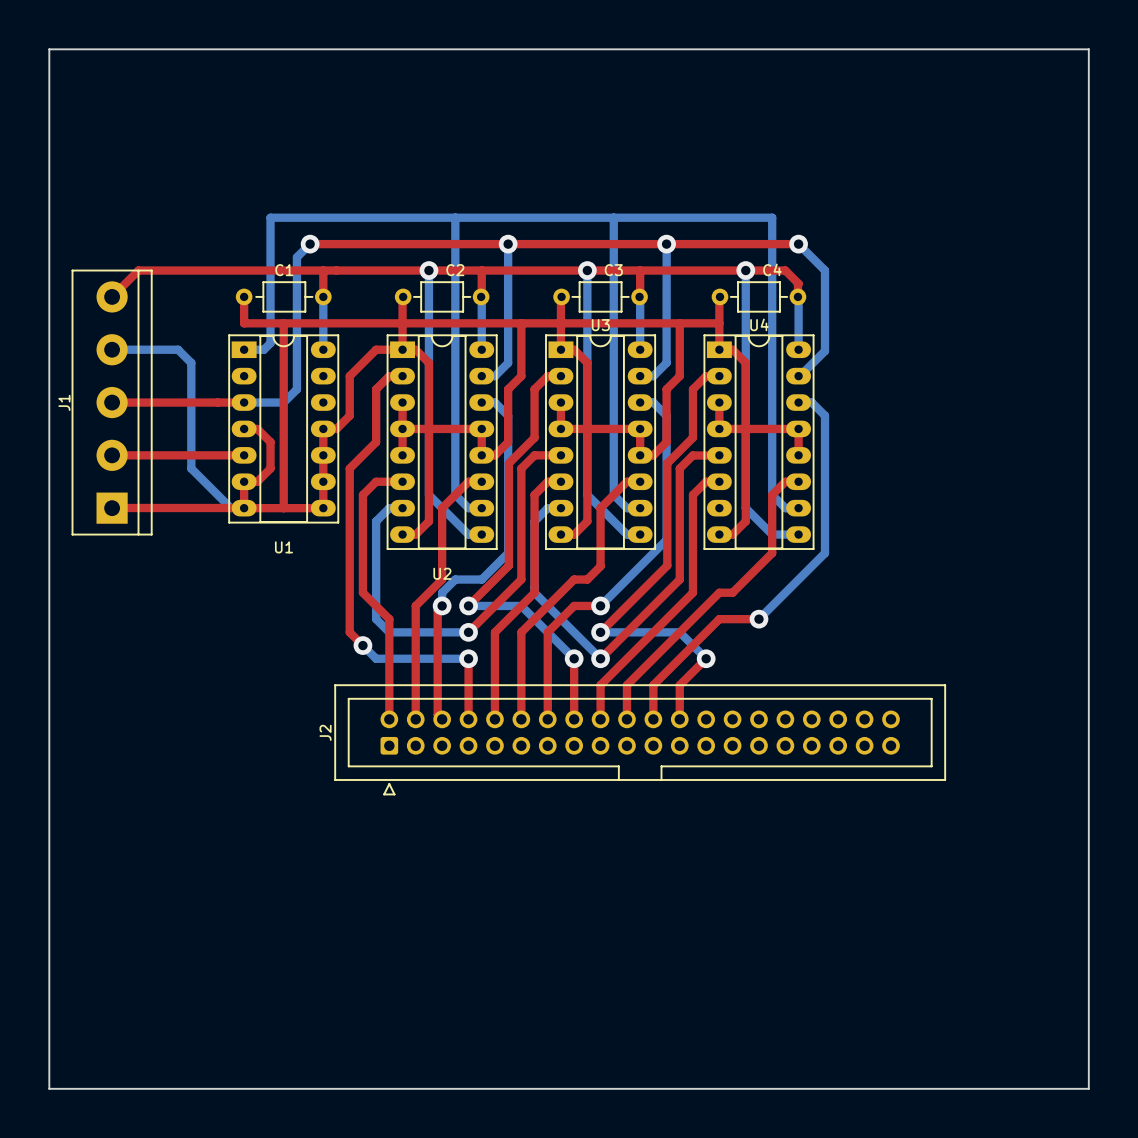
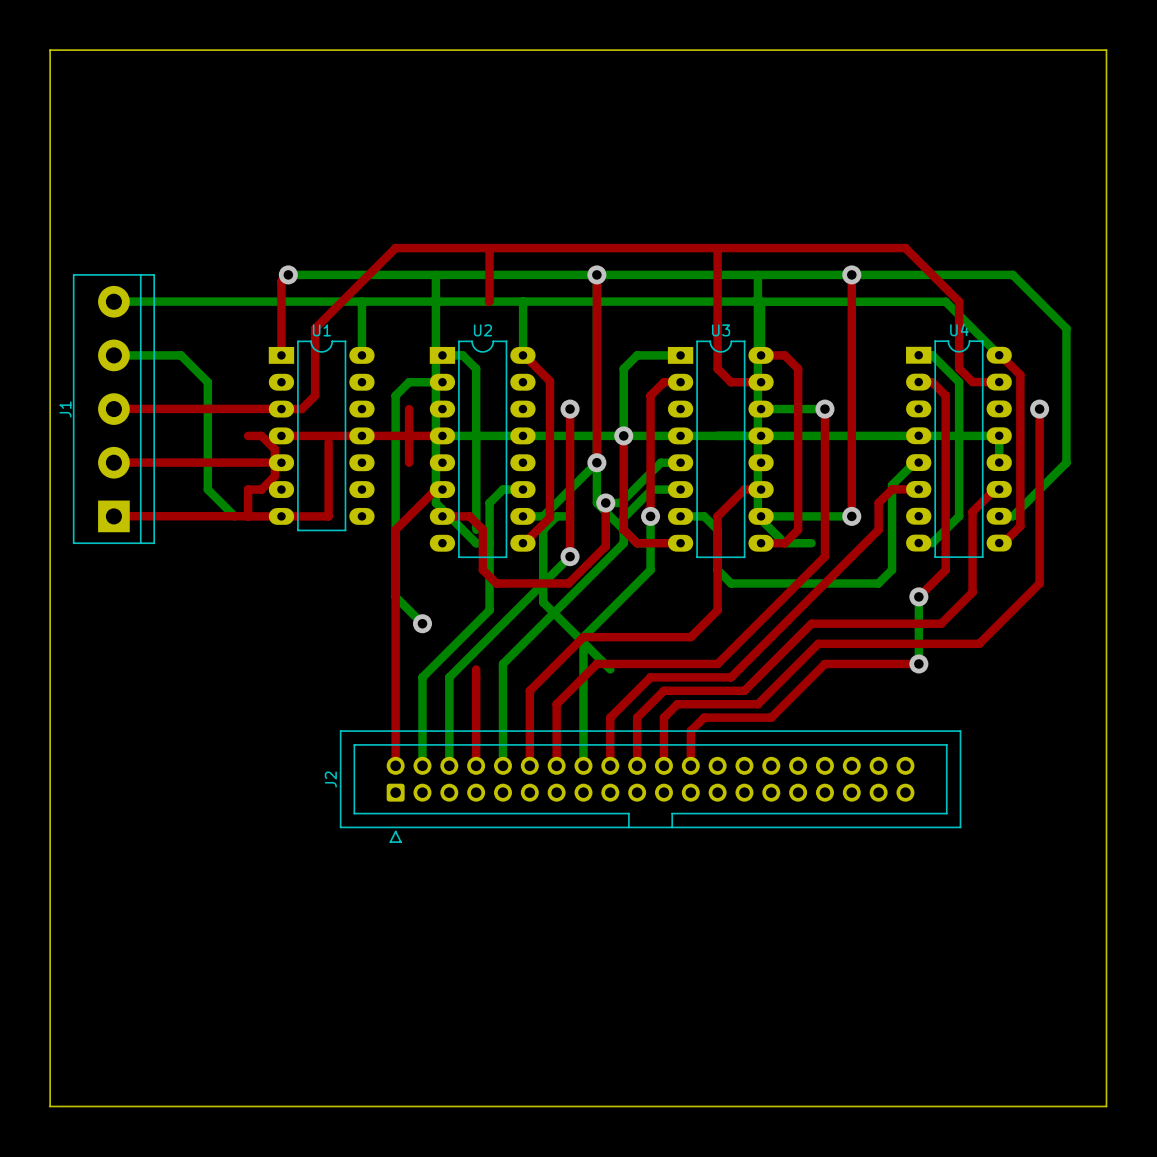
bottom track: (455, 217) (455, 494) (468, 508) (481, 508) -> none
bottom track: (613, 217) (613, 362) -> (680, 355) (637, 355) (623, 368)
bottom track: (310, 244) (296, 257) (296, 389) (283, 402) (244, 402) -> none
top track: (310, 244) (389, 244) -> (120, 408) (301, 409) (315, 395) (315, 328) (395, 248)
via position: (310, 244) -> (288, 274)
bottom track: (508, 244) (508, 362) (494, 376) (481, 376) -> none
via: (508, 244) -> none
bottom track: (666, 244) (666, 362) (653, 376) (640, 376) -> none
via: (666, 244) -> none
top track: none -> (717, 248) (717, 368) (731, 382) (761, 382)
bottom track: (798, 244) (825, 270) (825, 351) (798, 376) -> none
top track: none -> (811, 248) (905, 248) (959, 301) (959, 368) (972, 382) (999, 382)
via: (798, 244) -> none
bottom track: none -> (288, 274) (1012, 274) (1066, 328) (1066, 462) (1012, 516) (999, 516)
top track: (283, 270) (138, 270) (112, 296) -> (288, 274) (281, 281) (281, 355)
top track: (283, 270) (785, 270) (798, 283) (797, 296) -> none
top track: (323, 270) (323, 296) -> (489, 248) (489, 274)
via: (428, 270) -> none
top track: (640, 270) (639, 296) -> none
via: (745, 270) -> none
top track: none -> (851, 274) (851, 516)
via: none -> (851, 274)
bottom track: none -> (120, 301) (761, 301) (761, 355)
top track: (244, 296) (244, 323) (719, 323) -> none
C1: (283, 296) -> none
bottom track: (323, 296) (323, 349) -> (361, 301) (361, 355)
top track: (403, 296) (402, 349) -> none
C2: (442, 296) -> none
bottom track: (481, 296) (481, 349) -> none
bottom track: none -> (523, 301) (522, 355)
top track: (561, 296) (560, 349) (574, 349) (587, 362) -> (596, 274) (596, 368)
C3: (600, 296) -> none
bottom track: (639, 296) (640, 349) -> none
top track: (720, 296) (719, 349) (732, 349) (745, 362) (745, 521) (732, 534) (719, 534) -> none
bottom track: none -> (757, 301) (945, 301) (999, 355)
C4: (758, 296) -> none
bottom track: (797, 296) (798, 349) -> none
top track: (283, 323) (283, 508) -> none
top track: (521, 323) (521, 376) (508, 389) (508, 442) (494, 455) (481, 455) (481, 428) (435, 428) -> none
top track: (679, 323) (679, 376) (666, 389) (666, 442) (653, 455) (640, 455) -> (650, 516) (650, 462)
U1 footprint: [228, 334, 339, 524] -> [268, 340, 375, 532]
U2 footprint: [386, 334, 498, 550] -> [429, 340, 536, 558]
U3 footprint: [545, 334, 656, 550] -> [667, 340, 774, 558]
U4 footprint: [703, 334, 815, 550] -> [906, 340, 1012, 558]
bottom track: (244, 349) (263, 349) (270, 343) (270, 217) (772, 217) (772, 494) (785, 508) -> (761, 516) (798, 516)
bottom track: none -> (442, 355) (462, 355) (476, 368) (476, 436)
top track: none -> (522, 355) (549, 381) (549, 517) (522, 543)
top track: none -> (761, 355) (784, 355) (798, 368) (798, 529) (784, 543) (761, 543)
bottom track: none -> (918, 355) (932, 355) (959, 382) (959, 516) (932, 543) (918, 543)
top track: none -> (999, 355) (1020, 375) (1020, 526) (1003, 543) (999, 543)
bottom track: (191, 362) (191, 468) (204, 481) -> (194, 368) (207, 382) (207, 489)
top track: none -> (918, 382) (932, 382) (945, 395) (945, 570) (918, 596)
top track: (402, 376) (389, 376) (376, 389) (376, 442) (349, 468) (349, 632) (362, 645) -> none
bottom track: none -> (442, 382) (409, 382) (395, 395) (395, 596) (422, 623)
top track: (560, 376) (547, 376) (534, 389) (534, 437) (508, 463) (508, 565) (468, 605) -> none
top track: (719, 376) (706, 376) (692, 389) (692, 437) (667, 463) (667, 565) (600, 632) -> none
top track: (112, 402) (244, 402) -> none
bottom track: (481, 402) (494, 402) (508, 415) (508, 553) (481, 579) (455, 579) (442, 592) (442, 605) -> none
via: none -> (570, 409)
bottom track: (640, 402) (653, 402) (666, 415) (666, 539) (600, 605) -> none
top track: (719, 402) (719, 428) (798, 428) (798, 455) -> none
bottom track: none -> (761, 409) (811, 409)
bottom track: (811, 402) (825, 415) (825, 553) (758, 619) -> none
via: none -> (824, 409)
via: none -> (1039, 409)
top track: none -> (281, 435) (328, 435)
top track: (336, 428) (349, 415) (349, 376) (376, 349) (415, 349) (428, 362) (428, 521) (415, 534) (402, 534) -> (341, 435) (409, 435)
bottom track: none -> (442, 435) (999, 435) (999, 462)
bottom track: none -> (476, 435) (476, 529)
top track: (560, 428) (640, 428) -> (680, 382) (663, 382) (650, 395) (650, 435)
top track: none -> (570, 435) (570, 556)
bottom track: (613, 428) (613, 494) (626, 508) (640, 508) -> (583, 765) (583, 637) (650, 570) (650, 516)
top track: none -> (623, 435) (623, 529) (637, 543) (680, 543)
via: none -> (623, 435)
top track: (112, 455) (244, 455) -> none
top track: none -> (120, 462) (281, 462)
top track: (560, 455) (534, 455) (521, 468) (521, 579) (468, 632) -> none
bottom track: none -> (596, 462) (543, 516) (522, 516)
top track: (587, 455) (587, 521) (574, 534) (560, 534) -> none
via: none -> (596, 462)
bottom track: none -> (680, 462) (660, 462) (620, 502) (605, 502)
top track: (719, 455) (692, 455) (679, 468) (679, 579) (600, 658) -> none
bottom track: none -> (918, 462) (914, 462) (892, 485) (892, 569) (878, 583) (731, 583) (717, 570) (717, 529) (704, 516) (680, 516)
top track: (402, 481) (376, 481) (362, 494) (362, 592) (389, 619) -> (442, 489) (435, 489) (395, 529) (395, 629)
top track: (481, 481) (468, 481) (442, 508) (442, 579) (415, 605) (415, 719) -> none
bottom track: none -> (522, 489) (502, 489) (489, 502) (489, 610) (422, 677) (422, 765)
top track: (560, 481) (547, 481) (534, 494) (534, 592) (494, 632) (494, 719) -> none
top track: (640, 481) (626, 481) (600, 508) (600, 566) (587, 579) (574, 579) (521, 632) (521, 679) -> (761, 489) (744, 489) (717, 516) (717, 610) (690, 637) (583, 637) (529, 690)
bottom track: none -> (680, 489) (651, 489) (623, 517) (623, 543) (502, 663) (502, 765)
top track: (719, 481) (706, 481) (692, 494) (692, 592) (600, 685) (600, 706) -> (918, 489) (892, 489) (878, 502) (878, 529) (731, 677) (650, 677) (610, 717)
top track: (798, 481) (785, 481) (772, 494) (772, 553) (732, 592) (719, 592) (626, 685) (626, 706) -> (999, 489) (994, 489) (972, 511) (972, 592) (941, 623) (811, 623) (744, 690) (663, 690) (637, 717)
top track: none -> (605, 502) (605, 546) (568, 583) (496, 583) (482, 569) (482, 529) (469, 516) (442, 516)
via: none -> (605, 502)
bottom track: (402, 508) (389, 508) (376, 521) (376, 619) (389, 632) (468, 632) -> none
via: none -> (650, 516)
bottom track: none -> (811, 516) (851, 516)
via: none -> (851, 516)
U1 name position: U1 (283, 547) -> U1 (321, 330)
bottom track: none -> (570, 556) (449, 677) (449, 765)
via: none -> (570, 556)
U2 name position: U2 (442, 573) -> U2 (482, 330)
bottom track: none -> (918, 596) (918, 663)
via: none -> (918, 596)
top track: (442, 605) (437, 610) (437, 714) (442, 719) -> none
via: (442, 605) -> none
bottom track: (468, 605) (521, 605) (574, 658) -> none
via: (468, 605) -> none
top track: (600, 605) (574, 605) (547, 632) (547, 692) -> (824, 409) (824, 556) (717, 663) (596, 663) (556, 704)
via: (600, 605) -> none
via: none -> (422, 623)
top track: (758, 619) (719, 619) (653, 685) (653, 706) -> (1039, 409) (1039, 583) (979, 643) (818, 643) (757, 704) (677, 704) (663, 717)
via: (758, 619) -> none
via: (468, 632) -> none
bottom track: (600, 632) (679, 632) (706, 658) -> none
via: (600, 632) -> none
bottom track: (362, 645) (376, 658) (468, 658) -> none
via: (362, 645) -> none
top track: none -> (918, 663) (824, 663) (771, 717) (704, 717) (690, 731) (690, 765)
via: none -> (918, 663)
via: (468, 658) -> none
top track: (574, 658) (574, 719) -> none
via: (574, 658) -> none
via: (600, 658) -> none
top track: (706, 658) (679, 685) (679, 719) -> none
via: (706, 658) -> none
top track: none -> (395, 731) (395, 765)
top track: none -> (476, 731) (476, 765)
top track: none -> (529, 731) (529, 765)
top track: none -> (556, 731) (556, 765)
top track: none -> (610, 731) (610, 765)
top track: none -> (637, 731) (637, 765)
top track: none -> (663, 731) (663, 765)
J2 position: (640, 739) -> (650, 786)

